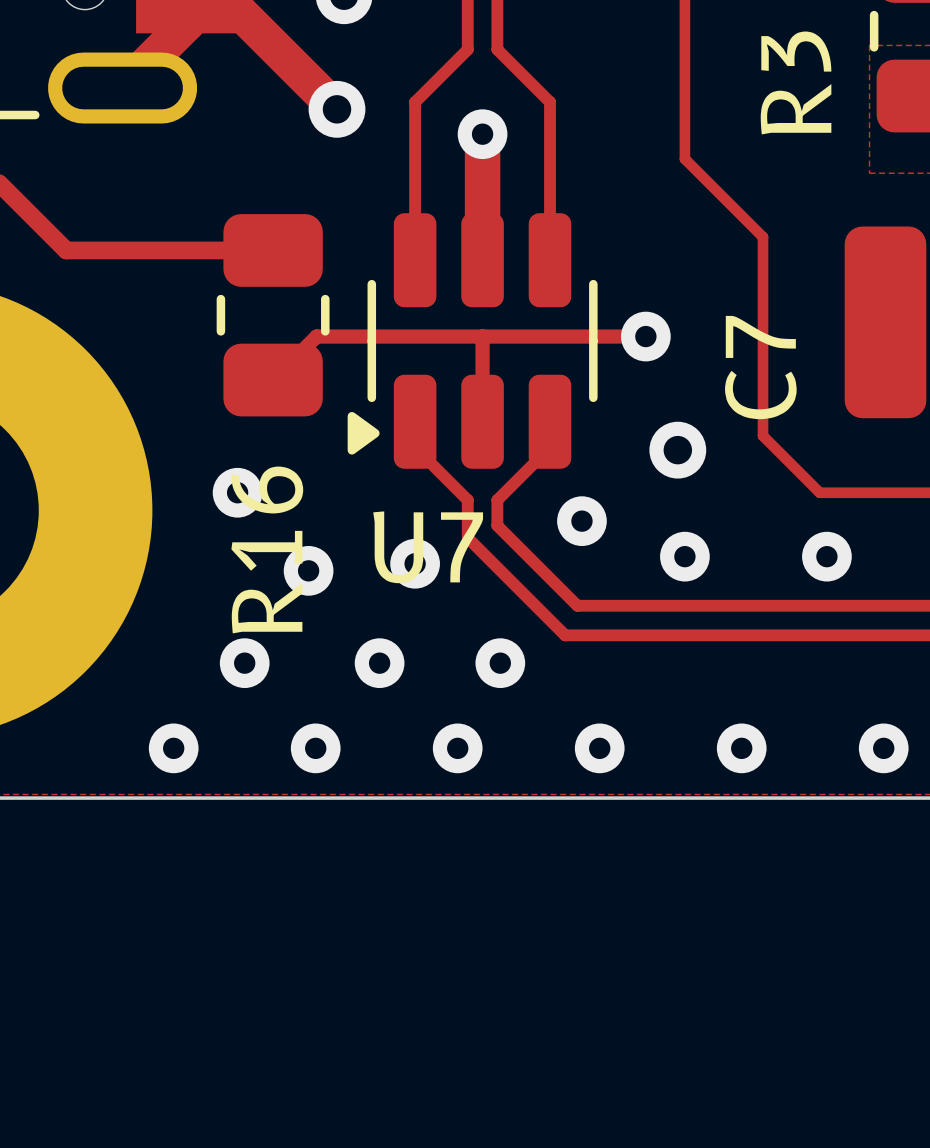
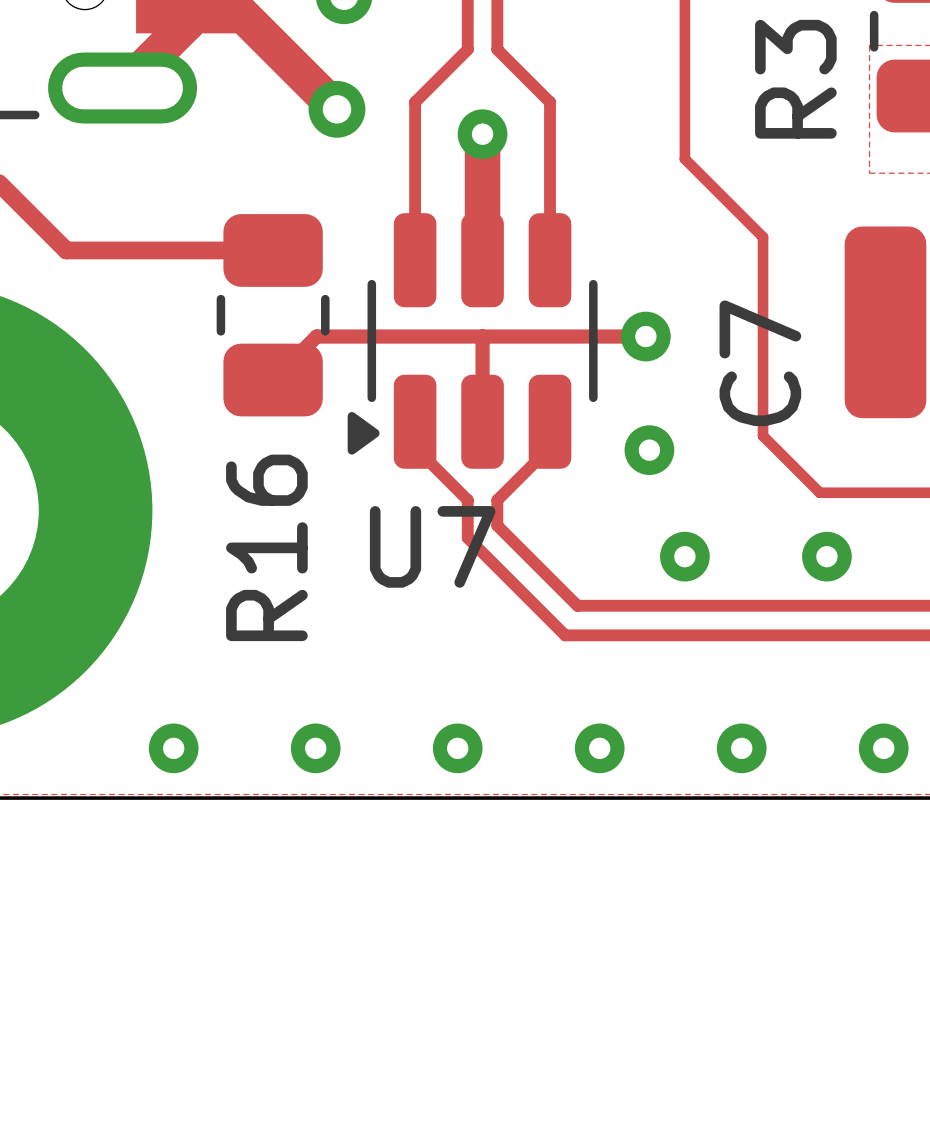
via: (677, 450) -> none
via: (237, 492) -> none
via position: (581, 521) -> (649, 450)
via: (415, 563) -> none
via: (308, 570) -> none
via: (244, 663) -> none
via: (379, 663) -> none
via: (500, 663) -> none

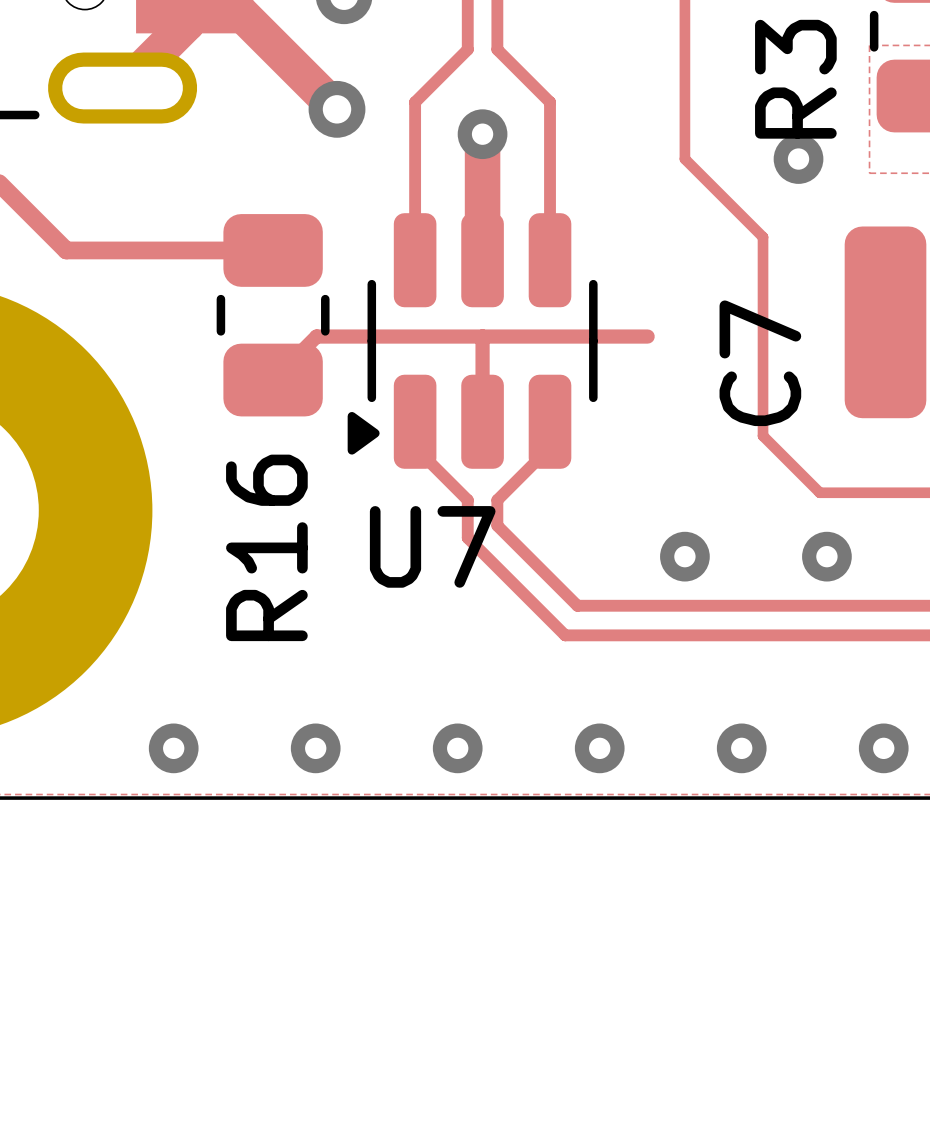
via: none -> (798, 159)
via: (645, 336) -> none
via: (649, 450) -> none

